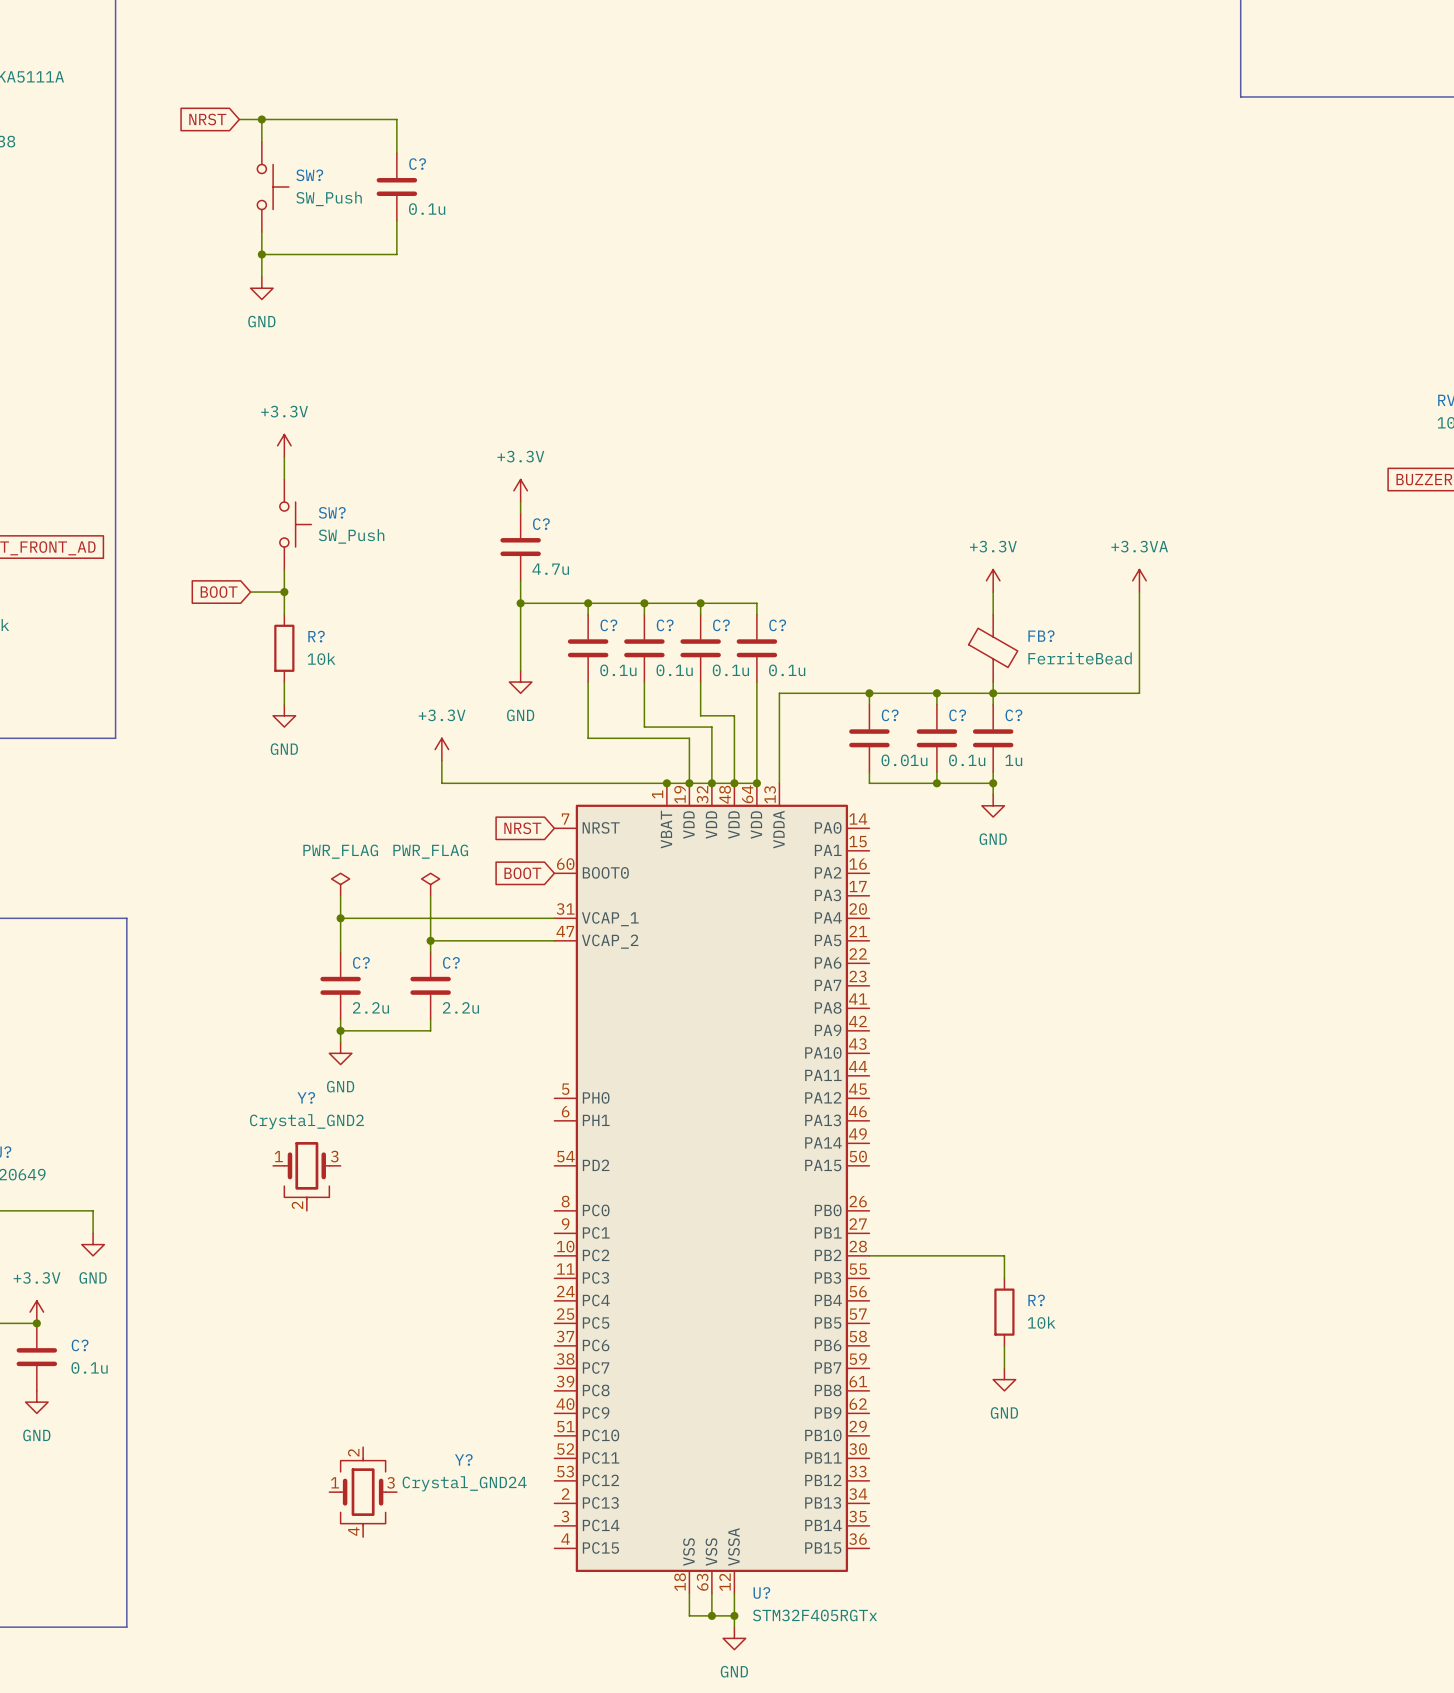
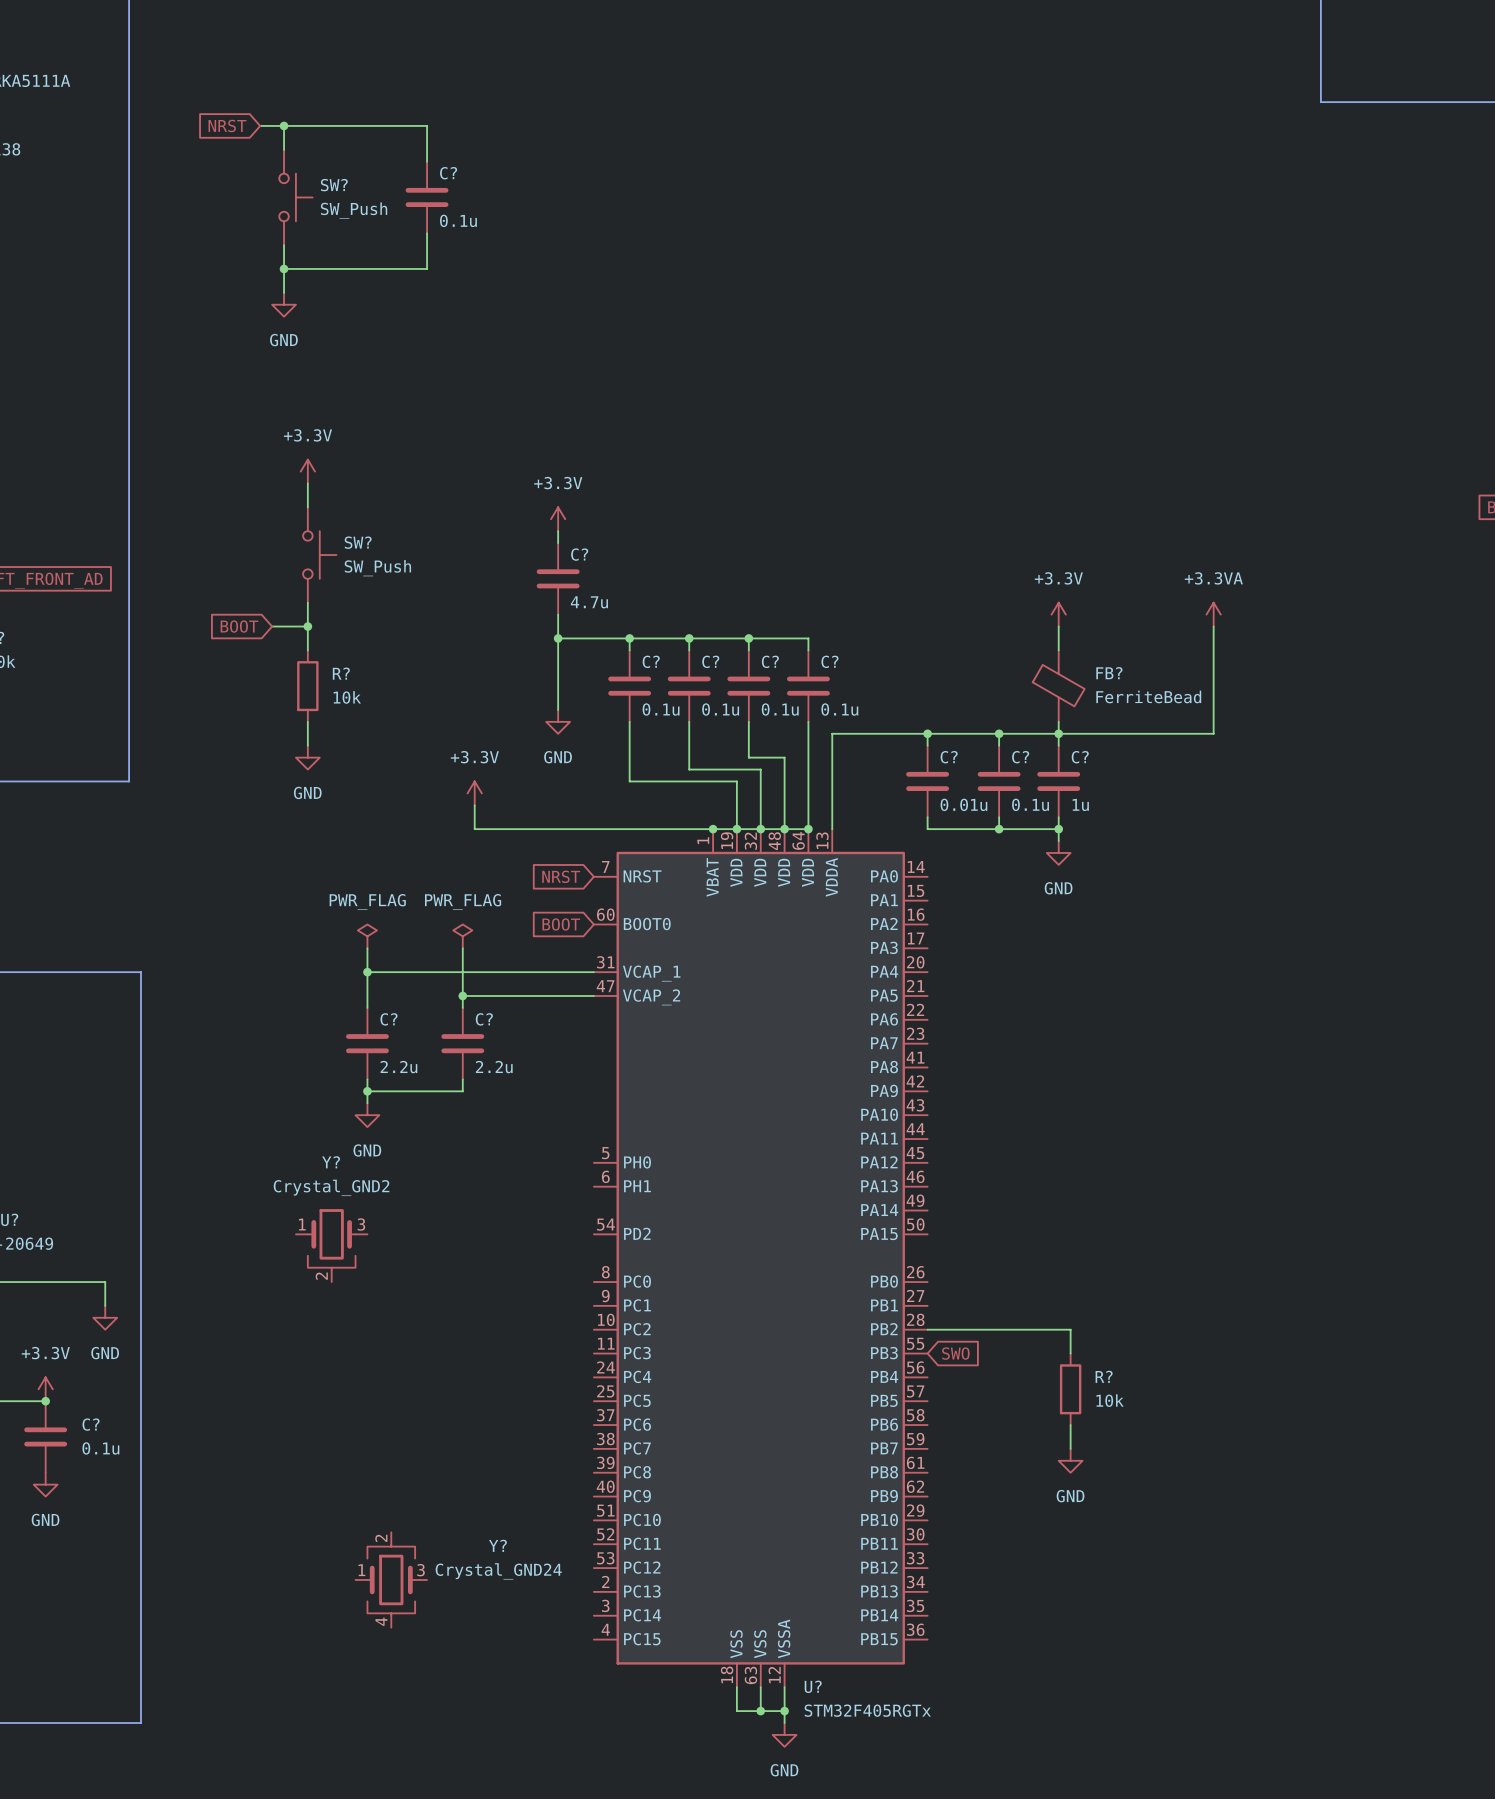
global label: none -> SWO (955, 1353)

